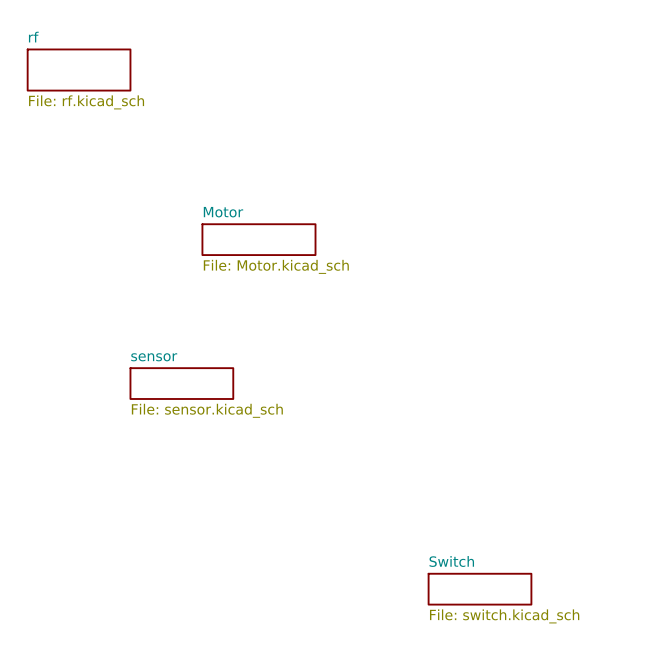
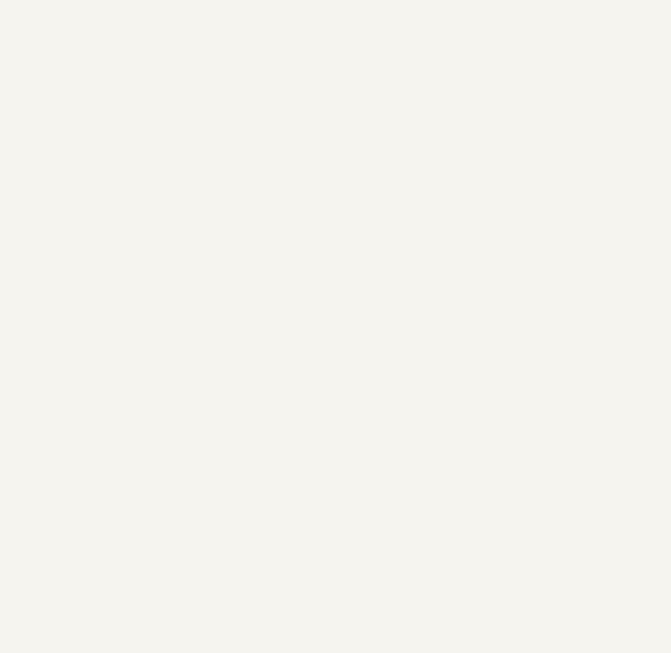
sheet rf: File: rf.kicad_sch (79, 70) -> none
sheet Motor: File: Motor.kicad_sch (258, 239) -> none
sheet sensor: File: sensor.kicad_sch (181, 383) -> none
sheet Switch: File: switch.kicad_sch (480, 589) -> none

